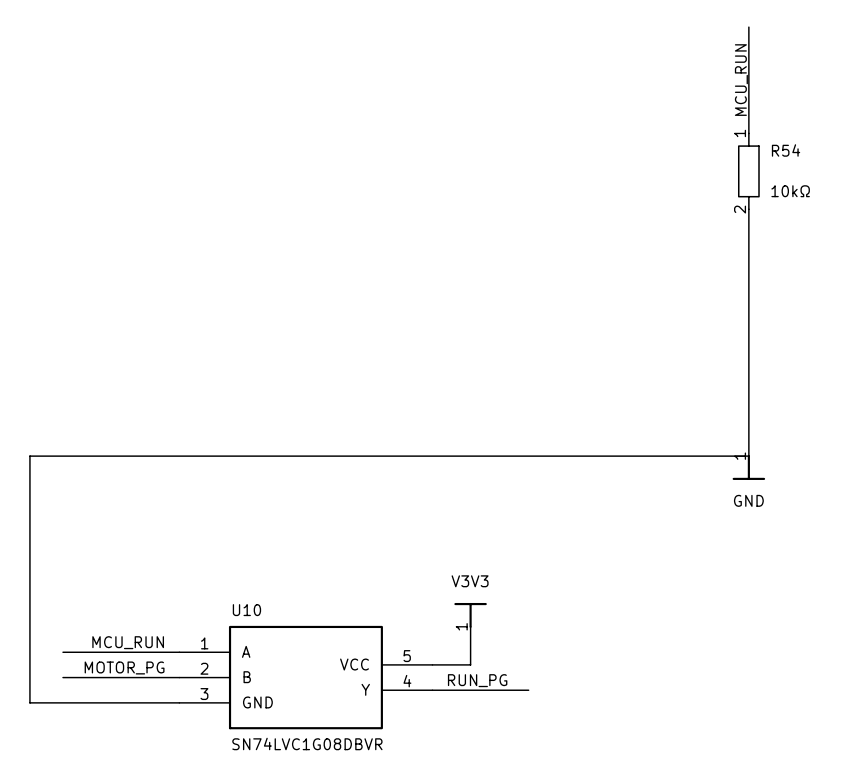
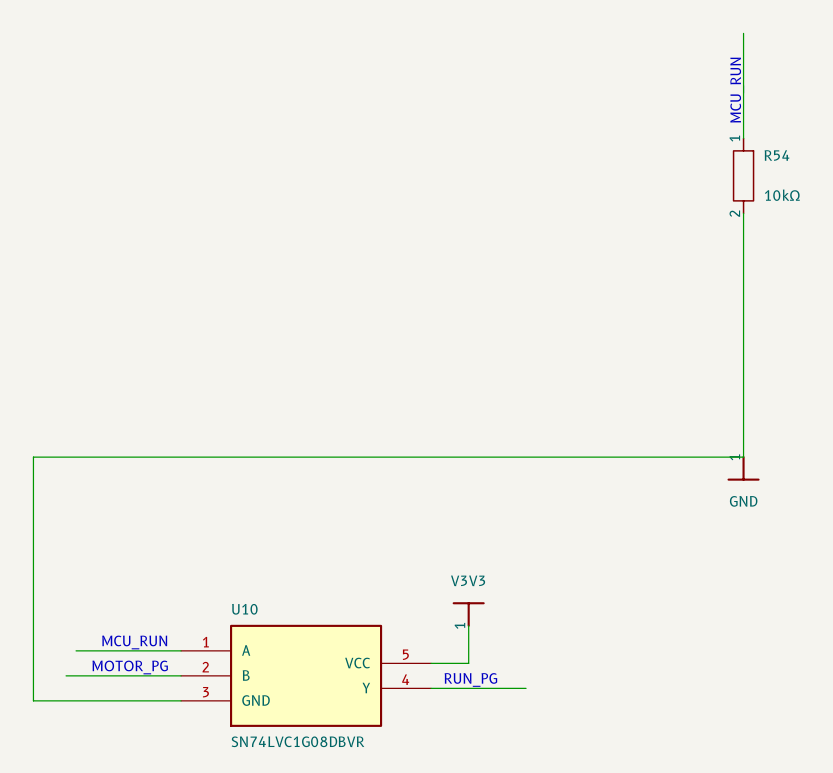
wire: (62, 652) (73, 652) -> none

